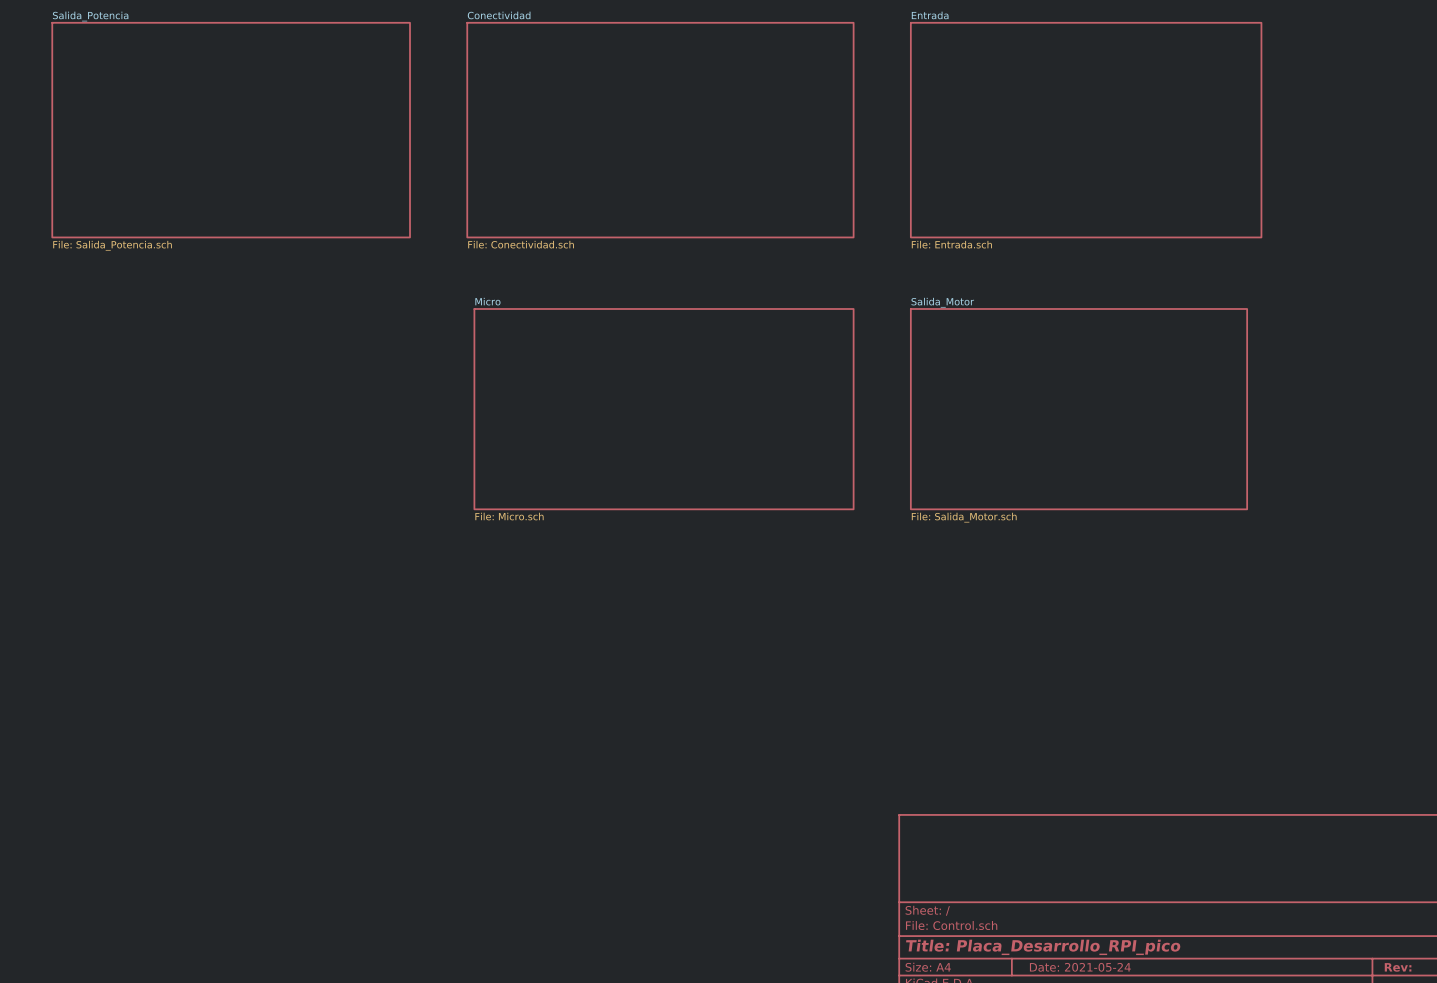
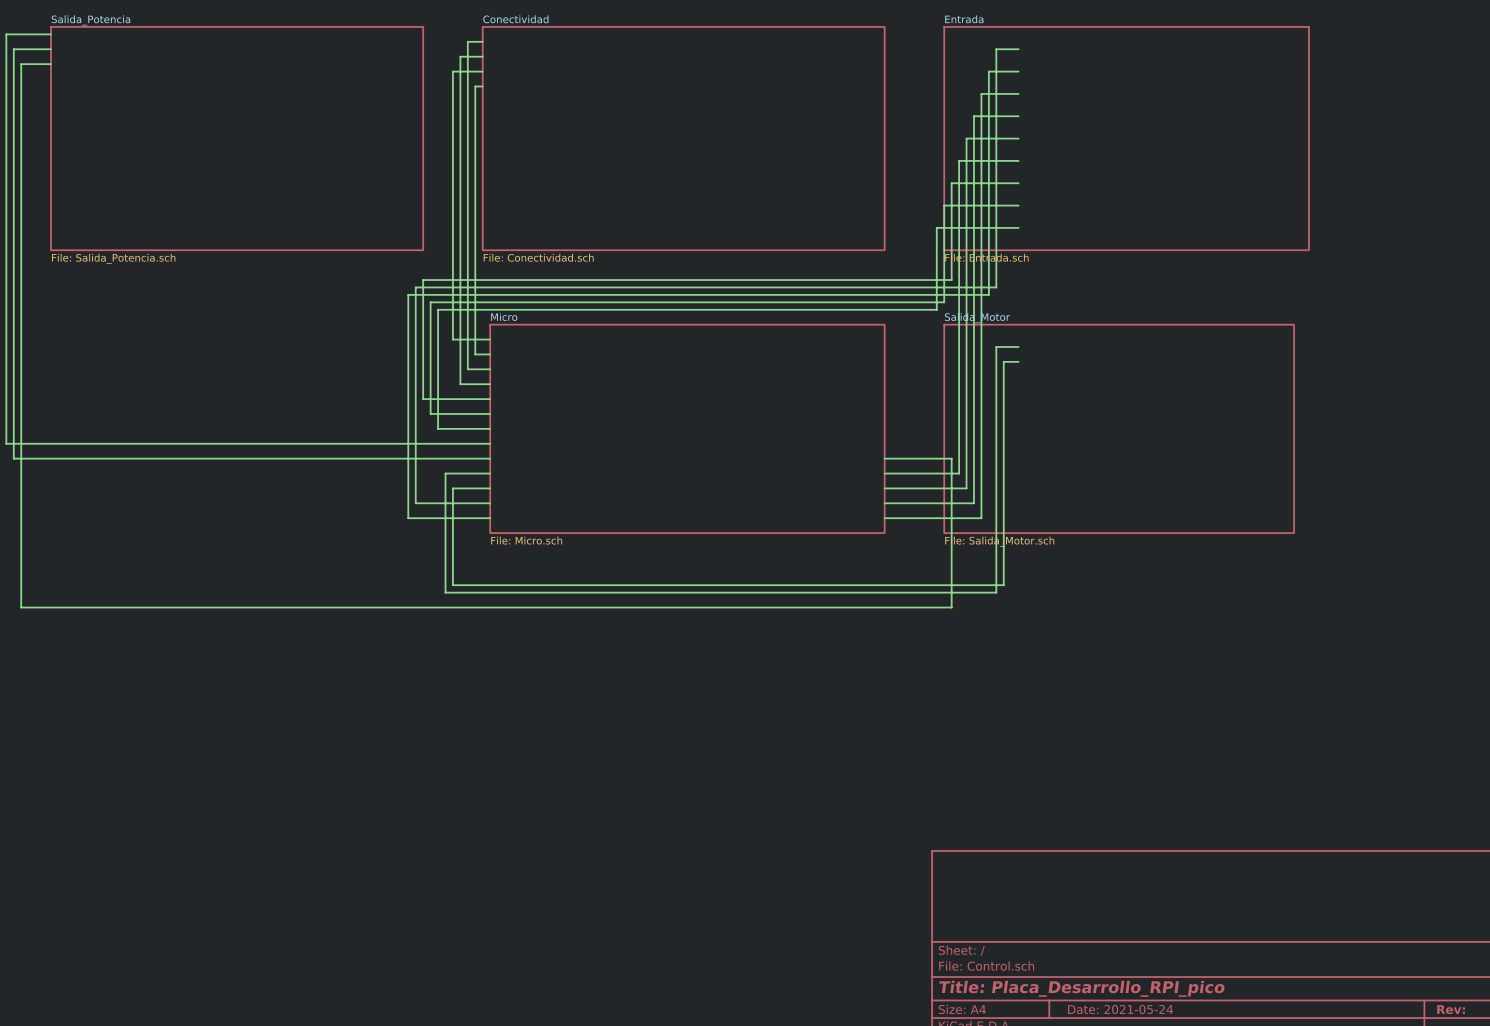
wire: none -> (51, 34) (6, 34) (6, 443) (490, 443)
wire: none -> (482, 41) (467, 41) (467, 369) (490, 369)
wire: none -> (51, 49) (13, 49) (13, 458) (490, 458)
wire: none -> (1018, 49) (996, 49) (996, 287) (415, 287) (415, 503) (490, 503)
wire: none -> (482, 56) (460, 56) (460, 384) (490, 384)
wire: none -> (51, 64) (21, 64) (21, 607) (951, 607) (951, 458) (884, 458)
wire: none -> (482, 71) (452, 71) (452, 339) (490, 339)
wire: none -> (1018, 71) (988, 71) (988, 294) (408, 294) (408, 518) (490, 518)
wire: none -> (482, 86) (475, 86) (475, 354) (490, 354)
wire: none -> (1018, 93) (981, 93) (981, 518) (884, 518)
wire: none -> (1018, 116) (973, 116) (973, 503) (884, 503)
wire: none -> (1018, 138) (966, 138) (966, 488) (884, 488)
wire: none -> (1018, 160) (959, 160) (959, 473) (884, 473)
wire: none -> (1018, 183) (951, 183) (951, 280) (423, 280) (423, 399) (490, 399)
wire: none -> (1018, 205) (944, 205) (944, 302) (430, 302) (430, 413) (490, 413)
wire: none -> (1018, 227) (936, 227) (936, 309) (438, 309) (438, 428) (490, 428)
wire: none -> (1018, 347) (996, 347) (996, 592) (445, 592) (445, 473) (490, 473)
wire: none -> (1018, 361) (1003, 361) (1003, 585) (452, 585) (452, 488) (490, 488)

